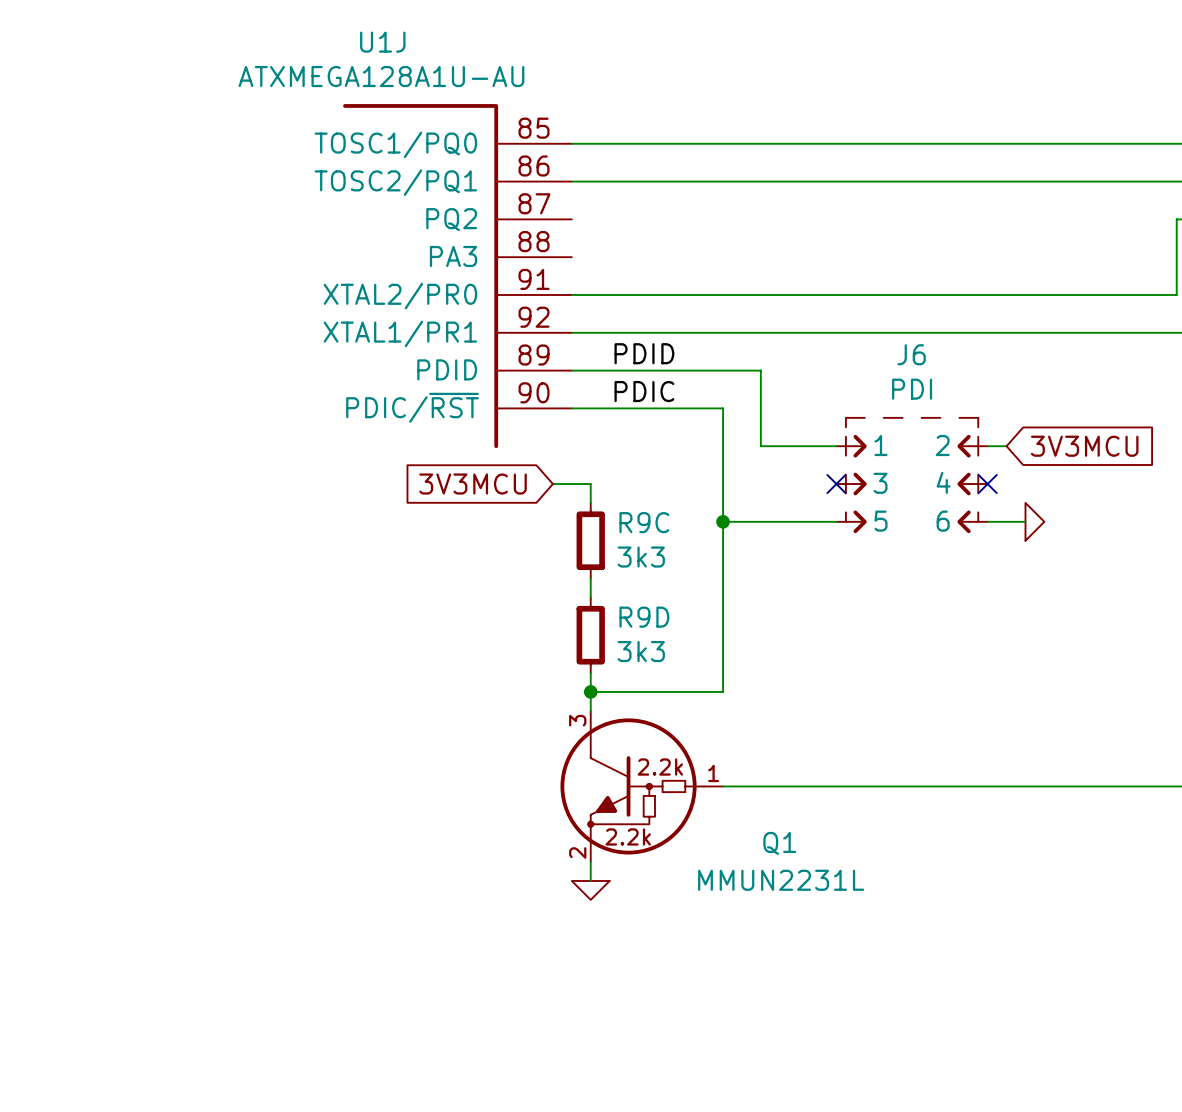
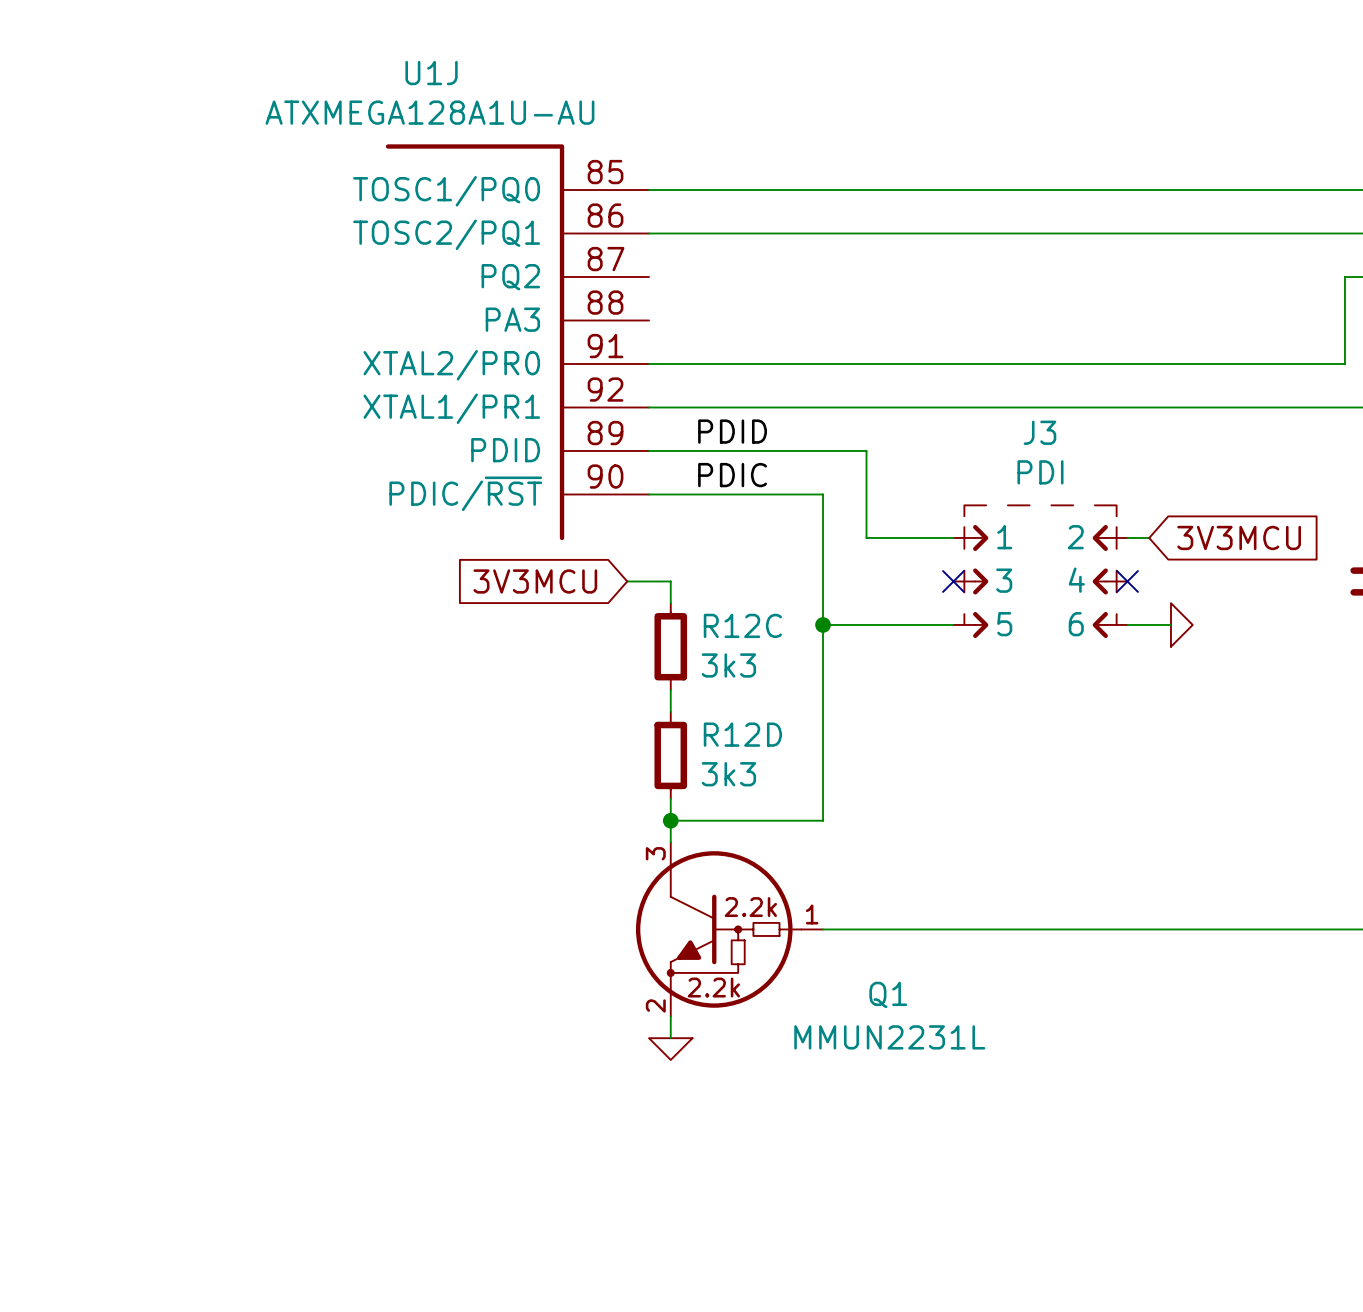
J6 name: J6 (911, 354) -> J3 (1039, 432)
R9C name: R9C (644, 522) -> R12C (742, 625)
R9D name: R9D (644, 617) -> R12D (742, 734)

